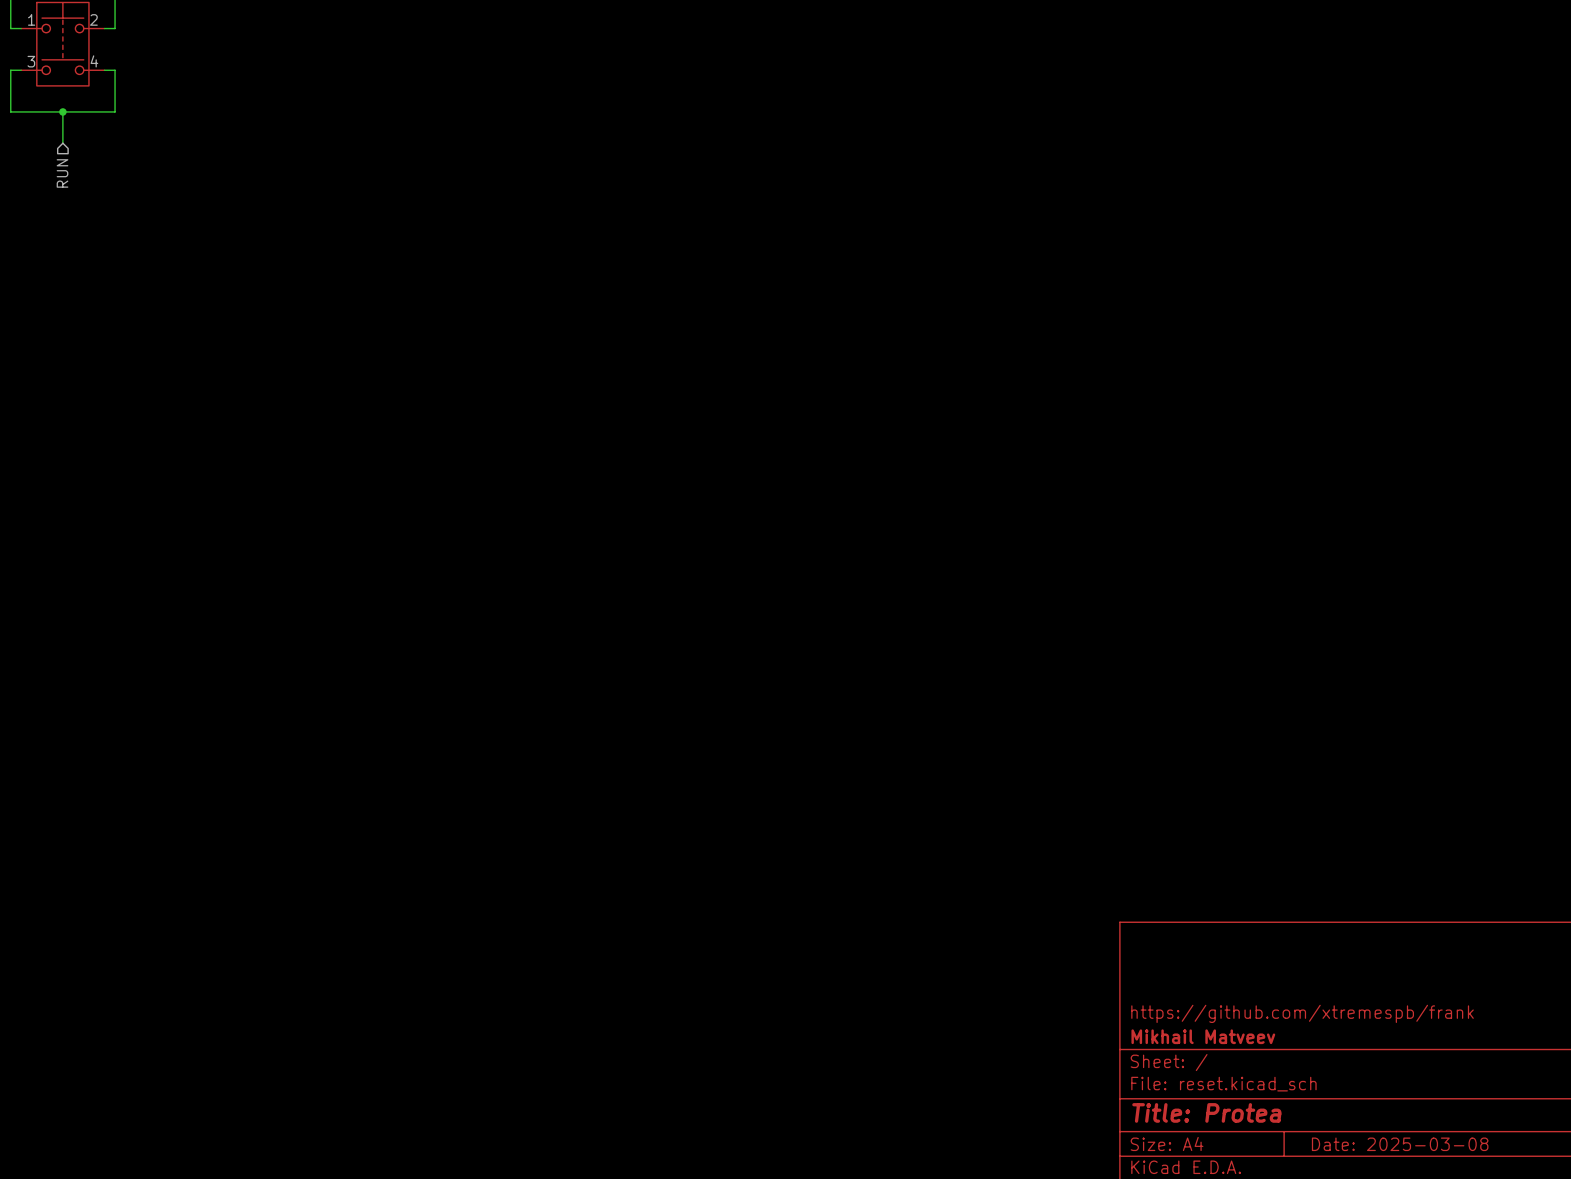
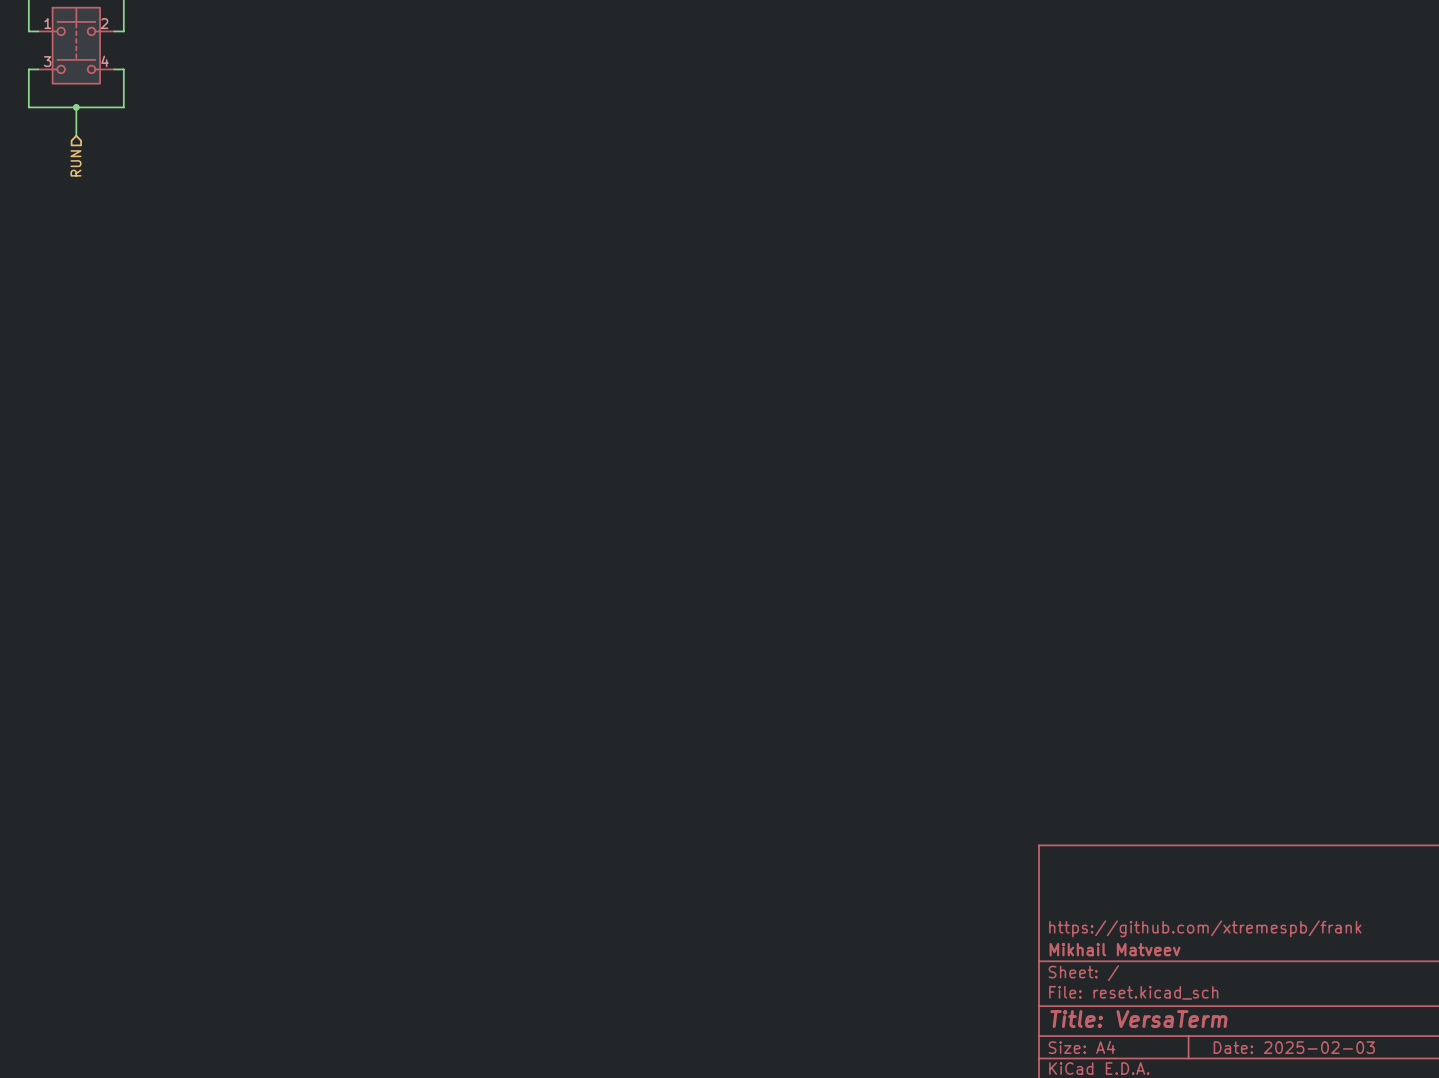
title block: Title: Protea (1206, 1112) -> Title: VersaTerm (1138, 1019)
title block: Date: 2025-03-08 (1400, 1144) -> Date: 2025-02-03 (1294, 1047)

